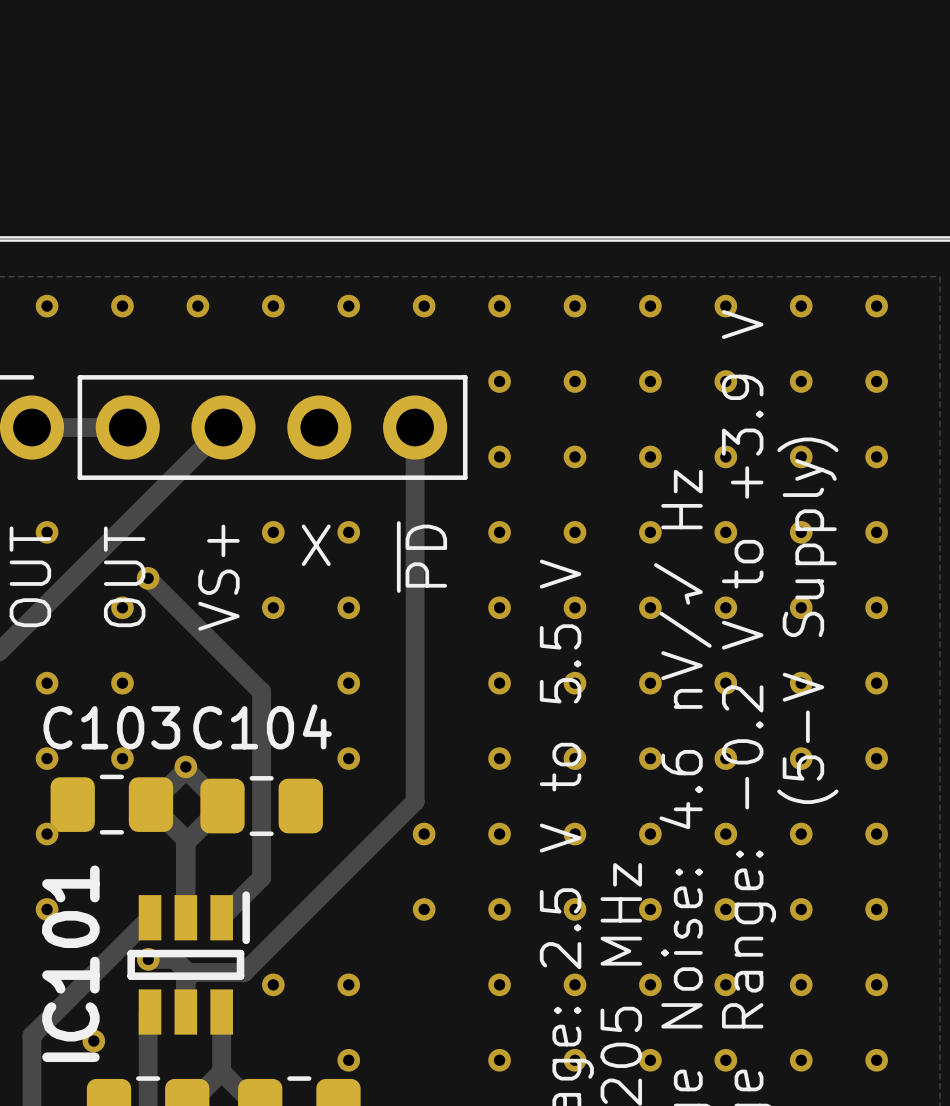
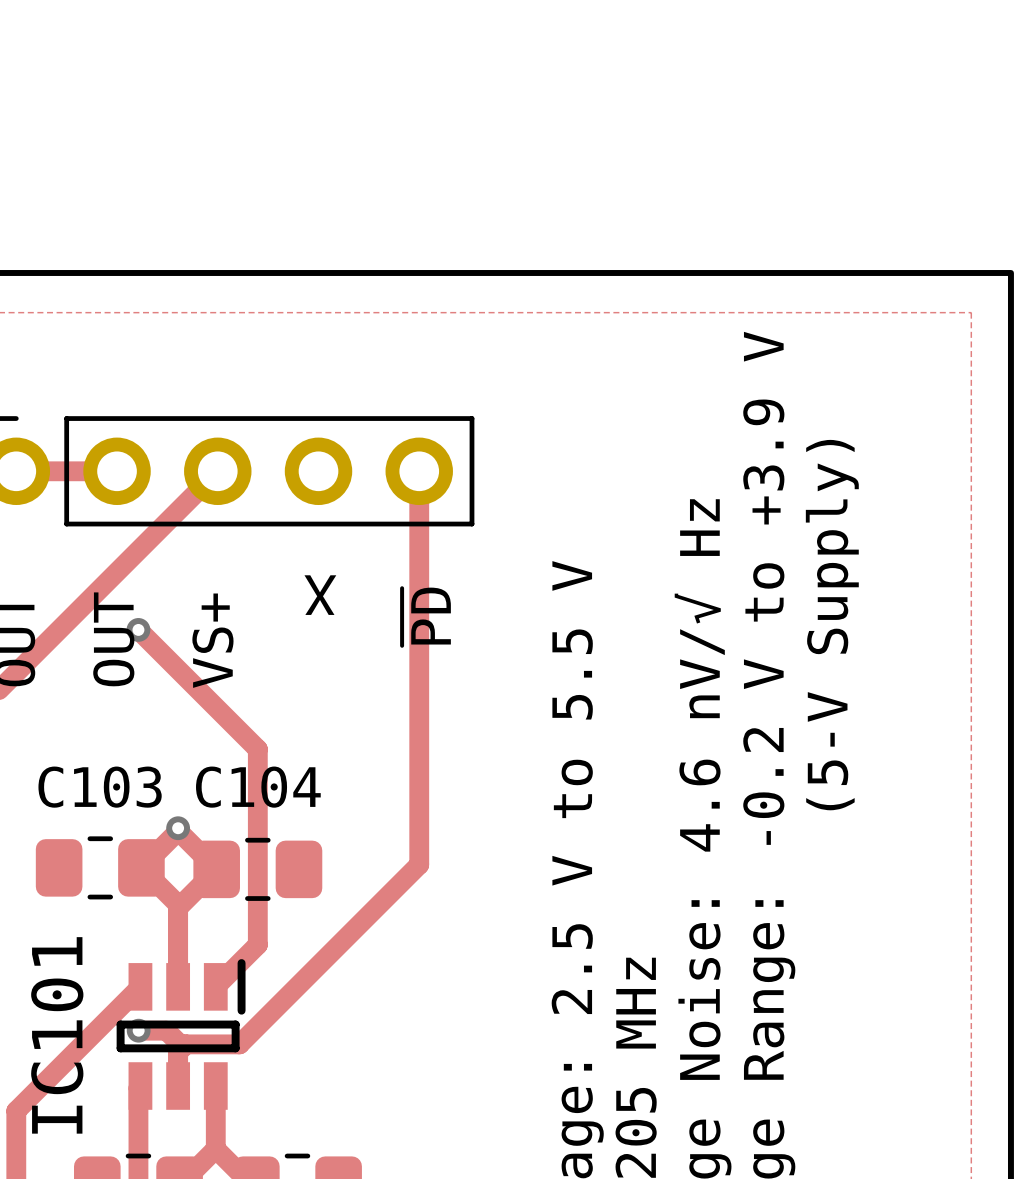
via: (47, 306) -> none
via: (122, 306) -> none
via: (197, 306) -> none
via: (273, 306) -> none
via: (348, 306) -> none
via: (424, 306) -> none
via: (499, 306) -> none
via: (574, 306) -> none
via: (650, 306) -> none
via: (725, 306) -> none
via: (801, 306) -> none
via: (876, 306) -> none
via: (499, 381) -> none
via: (574, 381) -> none
via: (650, 381) -> none
via: (725, 381) -> none
via: (801, 381) -> none
via: (876, 381) -> none
via: (499, 456) -> none
via: (574, 456) -> none
via: (650, 456) -> none
via: (725, 456) -> none
via: (801, 456) -> none
via: (876, 456) -> none
via: (47, 532) -> none
via: (273, 532) -> none
via: (348, 532) -> none
via: (499, 532) -> none
via: (574, 532) -> none
via: (650, 532) -> none
via: (725, 532) -> none
via: (801, 532) -> none
via: (876, 532) -> none
via: (122, 607) -> none
via: (273, 607) -> none
via: (348, 607) -> none
via: (499, 607) -> none
via: (574, 607) -> none
via: (650, 607) -> none
via: (725, 607) -> none
via: (801, 607) -> none
via: (876, 607) -> none
via: (47, 683) -> none
via: (122, 683) -> none
via: (348, 683) -> none
via: (499, 683) -> none
via: (574, 683) -> none
via: (650, 683) -> none
via: (725, 683) -> none
via: (801, 683) -> none
via: (876, 683) -> none
via: (47, 758) -> none
via: (122, 758) -> none
via: (348, 758) -> none
via: (499, 758) -> none
via: (574, 758) -> none
via: (650, 758) -> none
via: (725, 758) -> none
via: (801, 758) -> none
via: (876, 758) -> none
via: (47, 834) -> none
via: (424, 834) -> none
via: (499, 834) -> none
via: (574, 834) -> none
via: (650, 834) -> none
via: (725, 834) -> none
via: (801, 834) -> none
via: (876, 834) -> none
via: (47, 909) -> none
via: (424, 909) -> none
via: (499, 909) -> none
via: (574, 909) -> none
via: (650, 909) -> none
via: (725, 909) -> none
via: (801, 909) -> none
via: (876, 909) -> none
via: (273, 984) -> none
via: (348, 984) -> none
via: (499, 984) -> none
via: (574, 984) -> none
via: (650, 984) -> none
via: (725, 984) -> none
via: (801, 984) -> none
via: (876, 984) -> none
via: (93, 1041) -> none
via: (348, 1060) -> none
via: (499, 1060) -> none
via: (574, 1060) -> none
via: (650, 1060) -> none
via: (725, 1060) -> none
via: (801, 1060) -> none
via: (876, 1060) -> none

